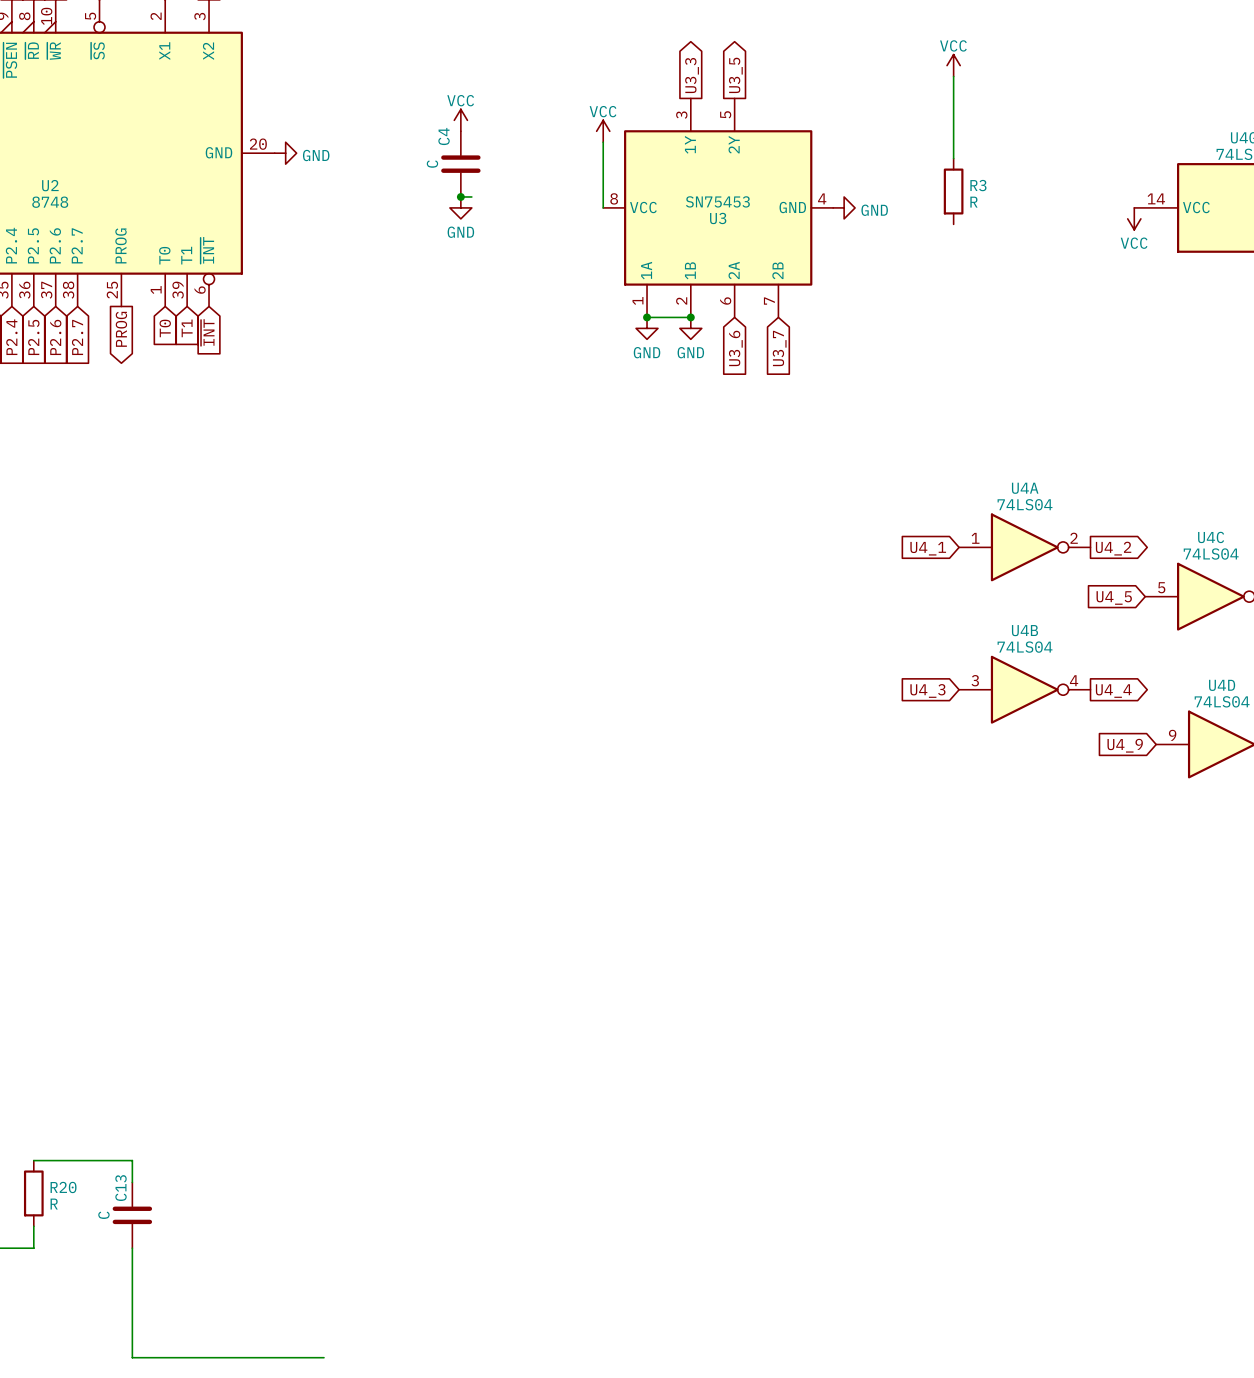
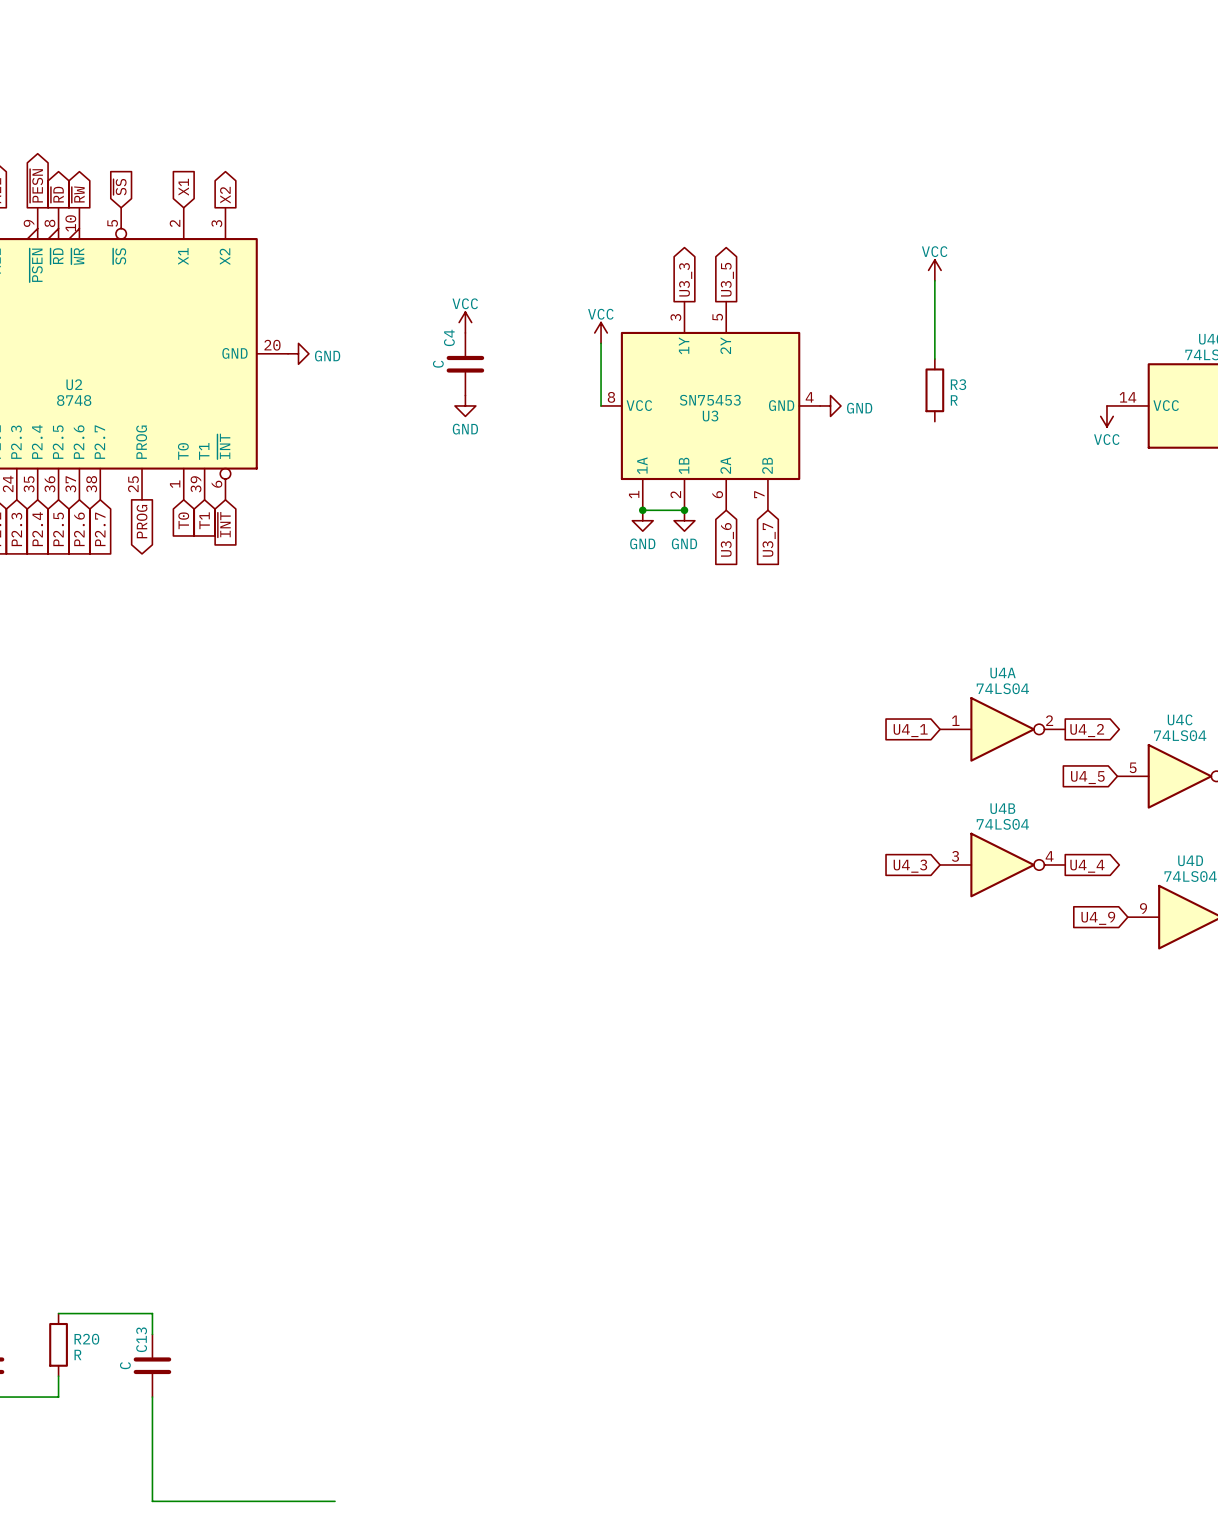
wire: (460, 196) (471, 196) -> none
junction: (460, 196) -> none

